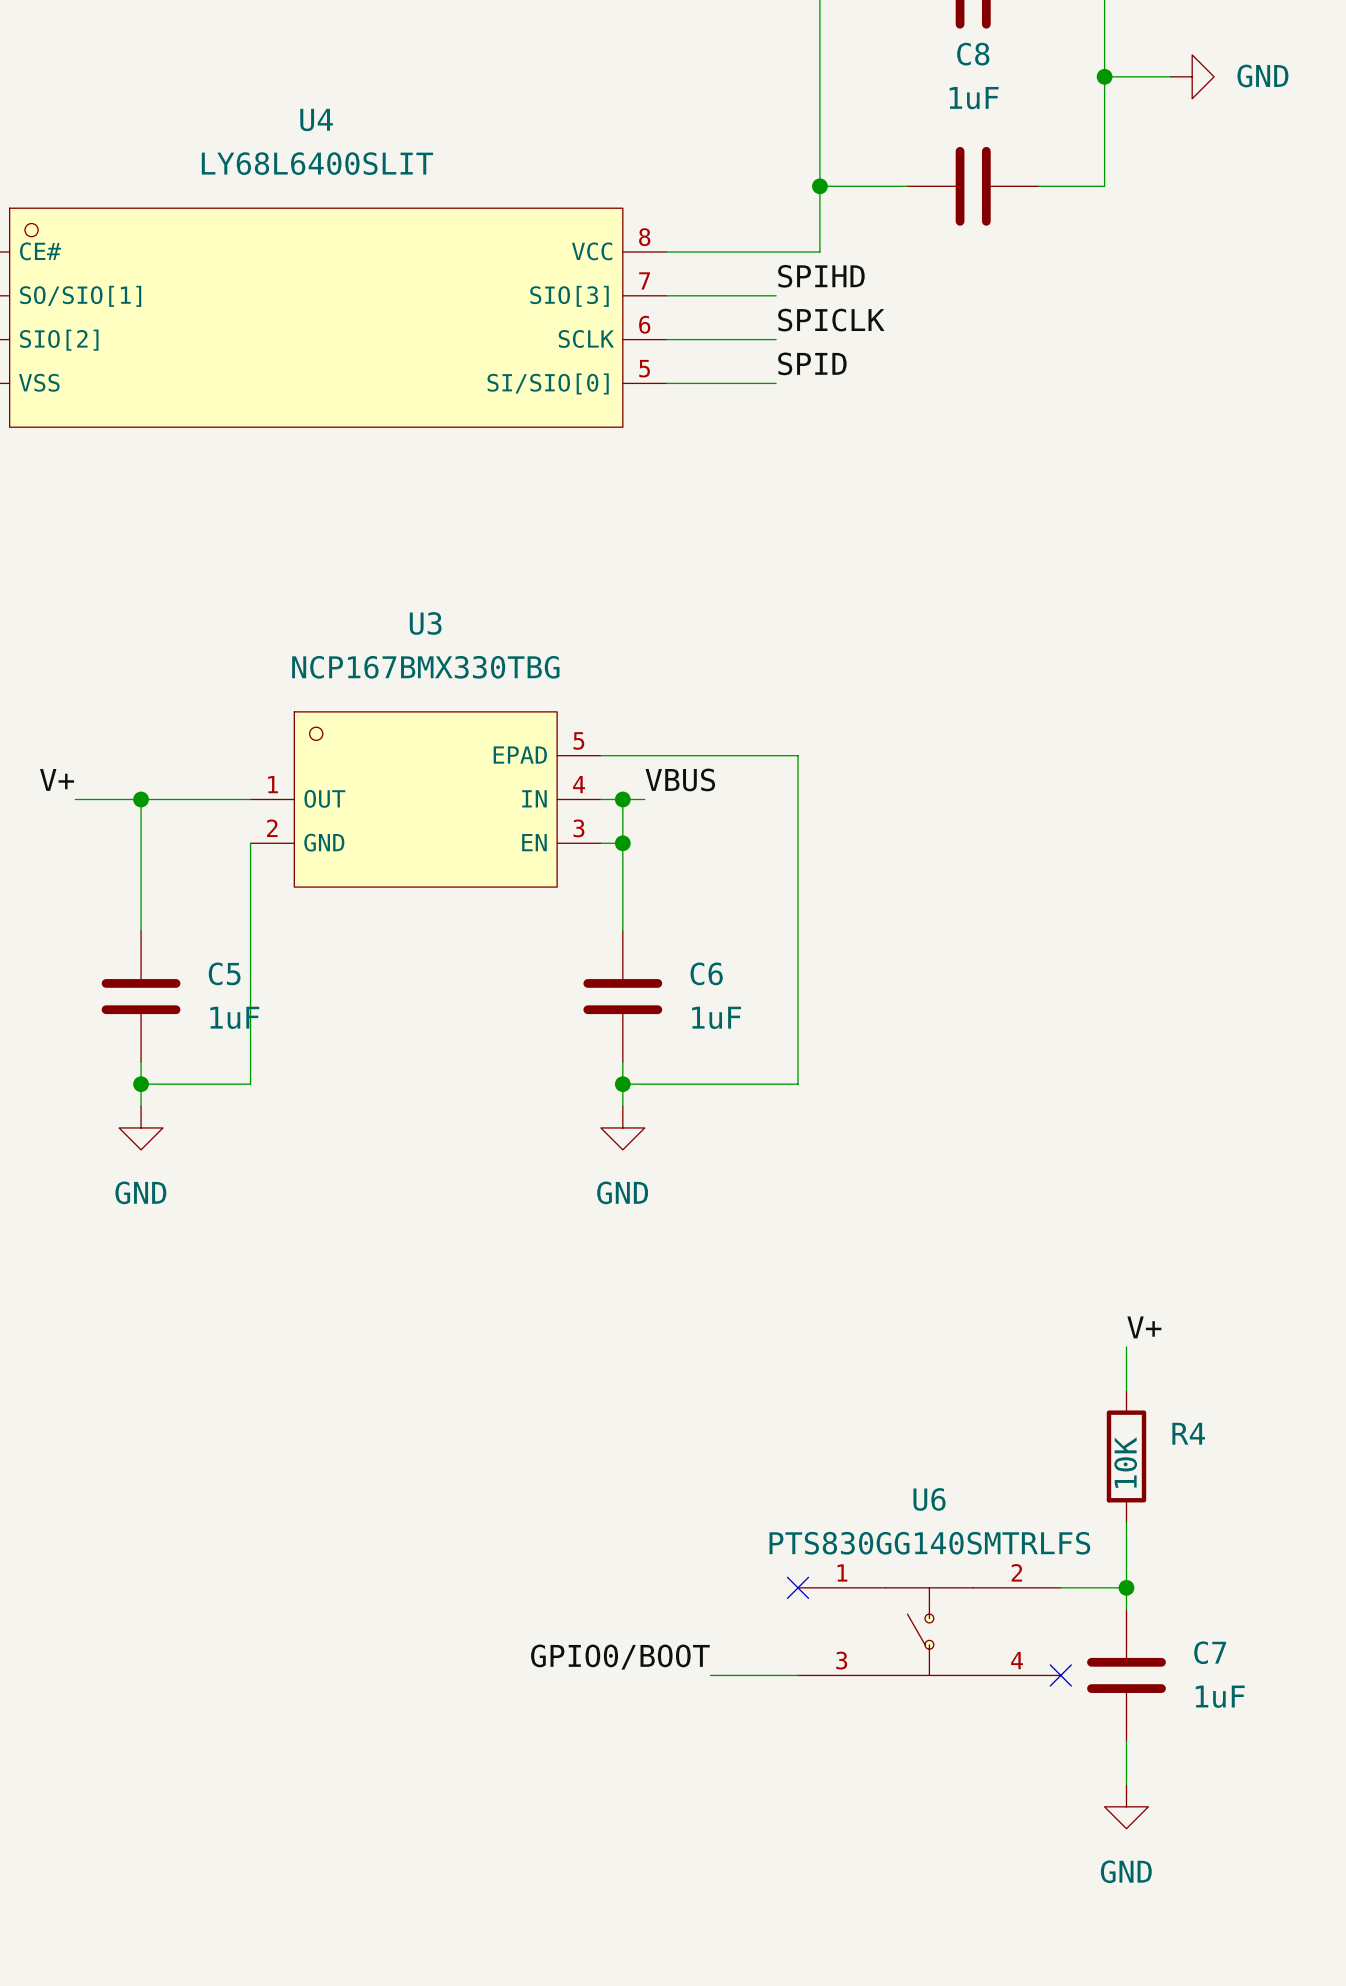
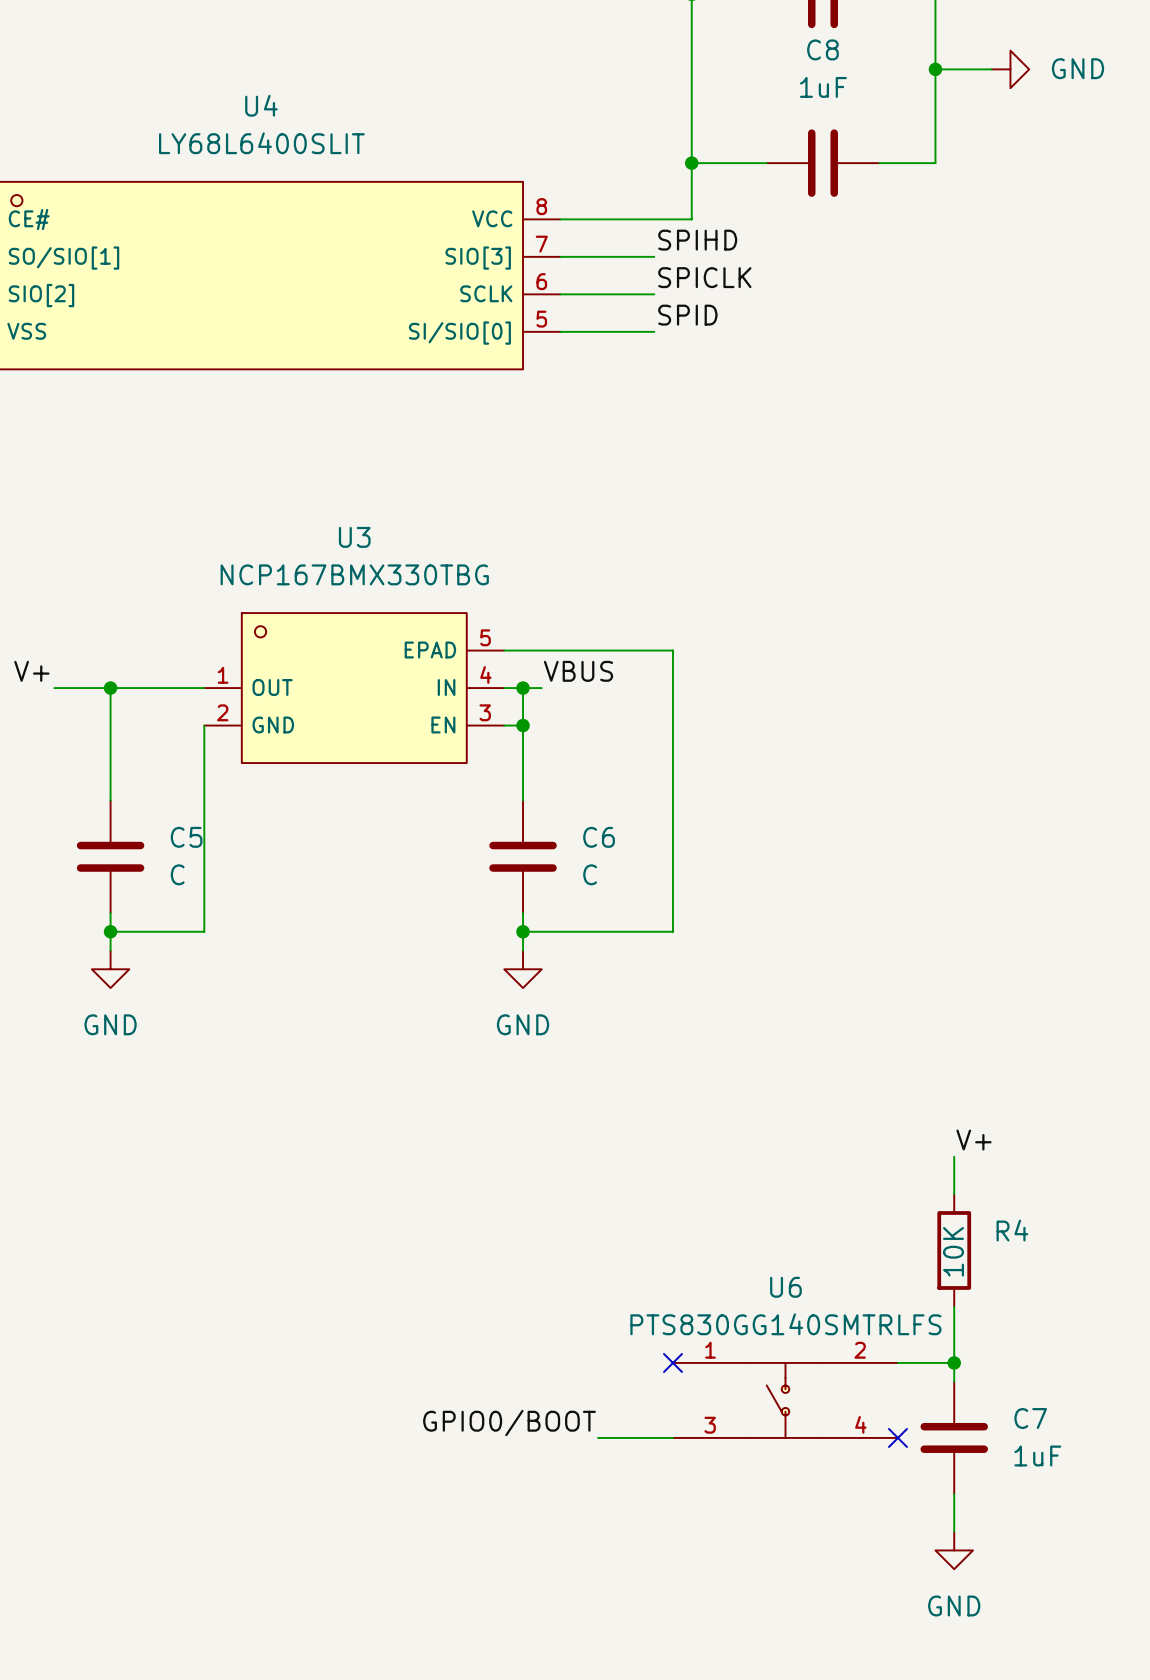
C5 value: 1uF (234, 1017) -> C (177, 874)
C6 value: 1uF (716, 1017) -> C (590, 874)

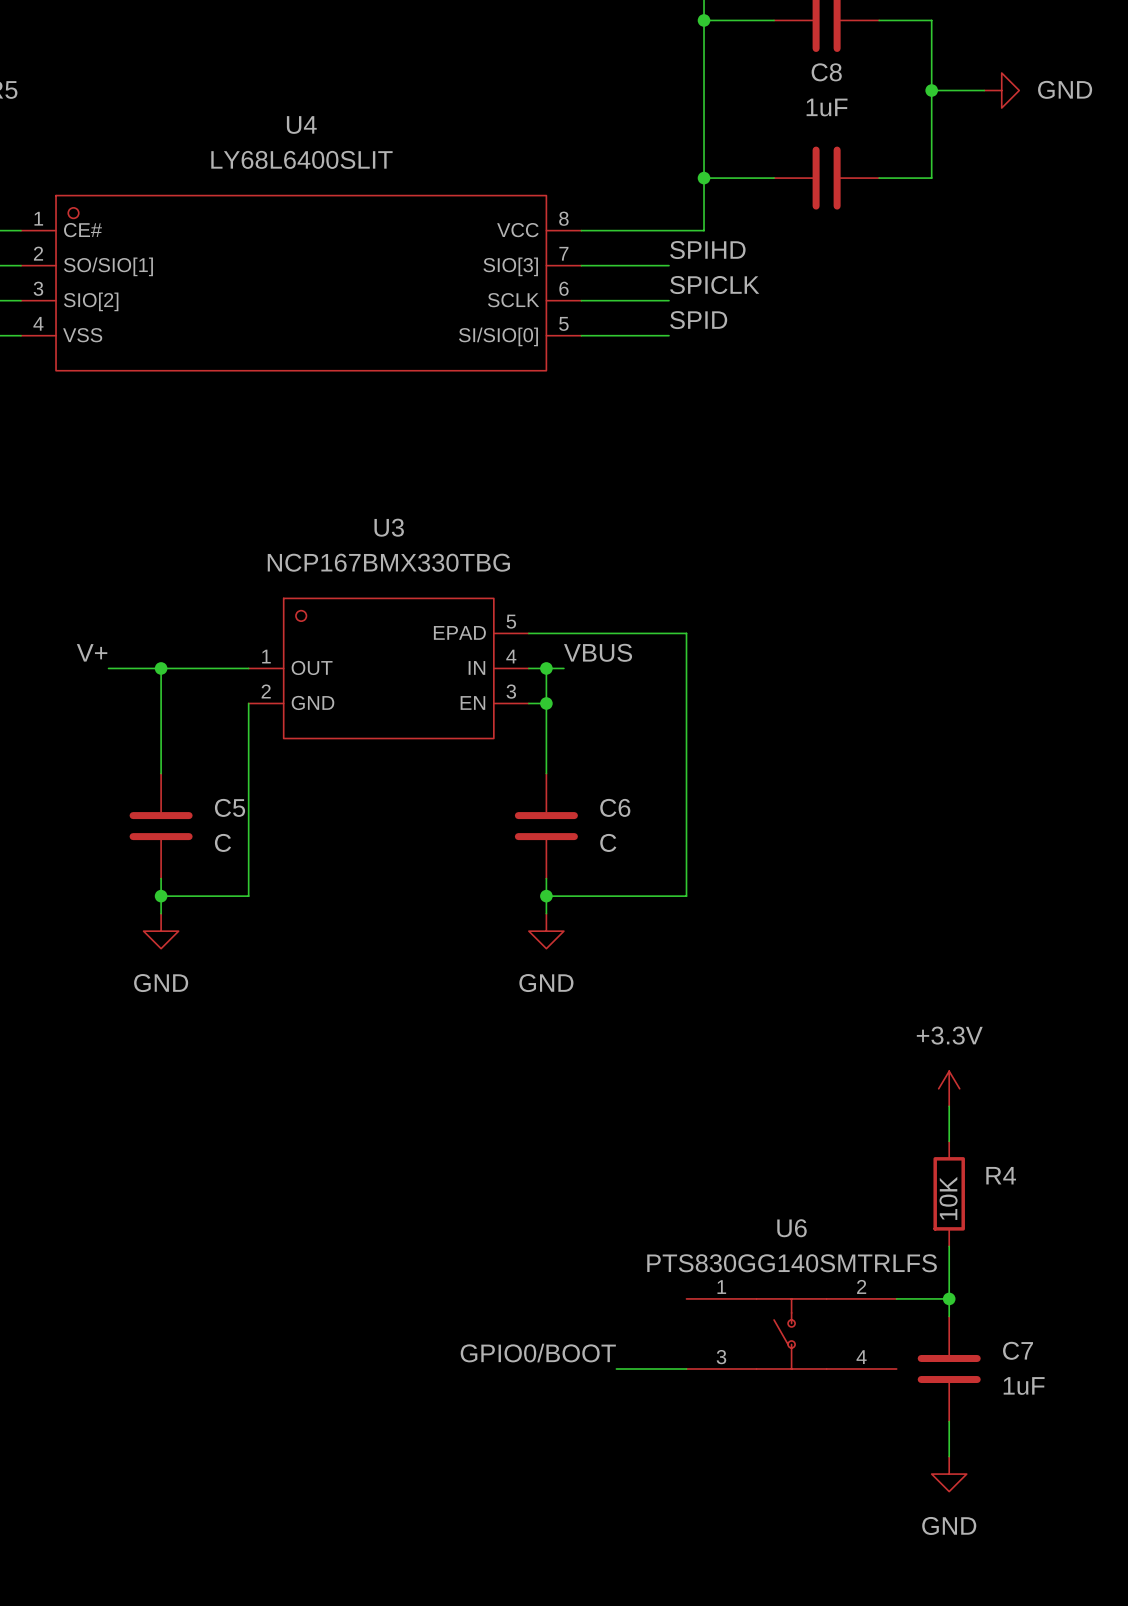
power symbol: none -> +3.3V (949, 1088)
label: V+ (974, 1140) -> none
no-connect mark: (673, 1362) -> none
no-connect mark: (897, 1437) -> none

